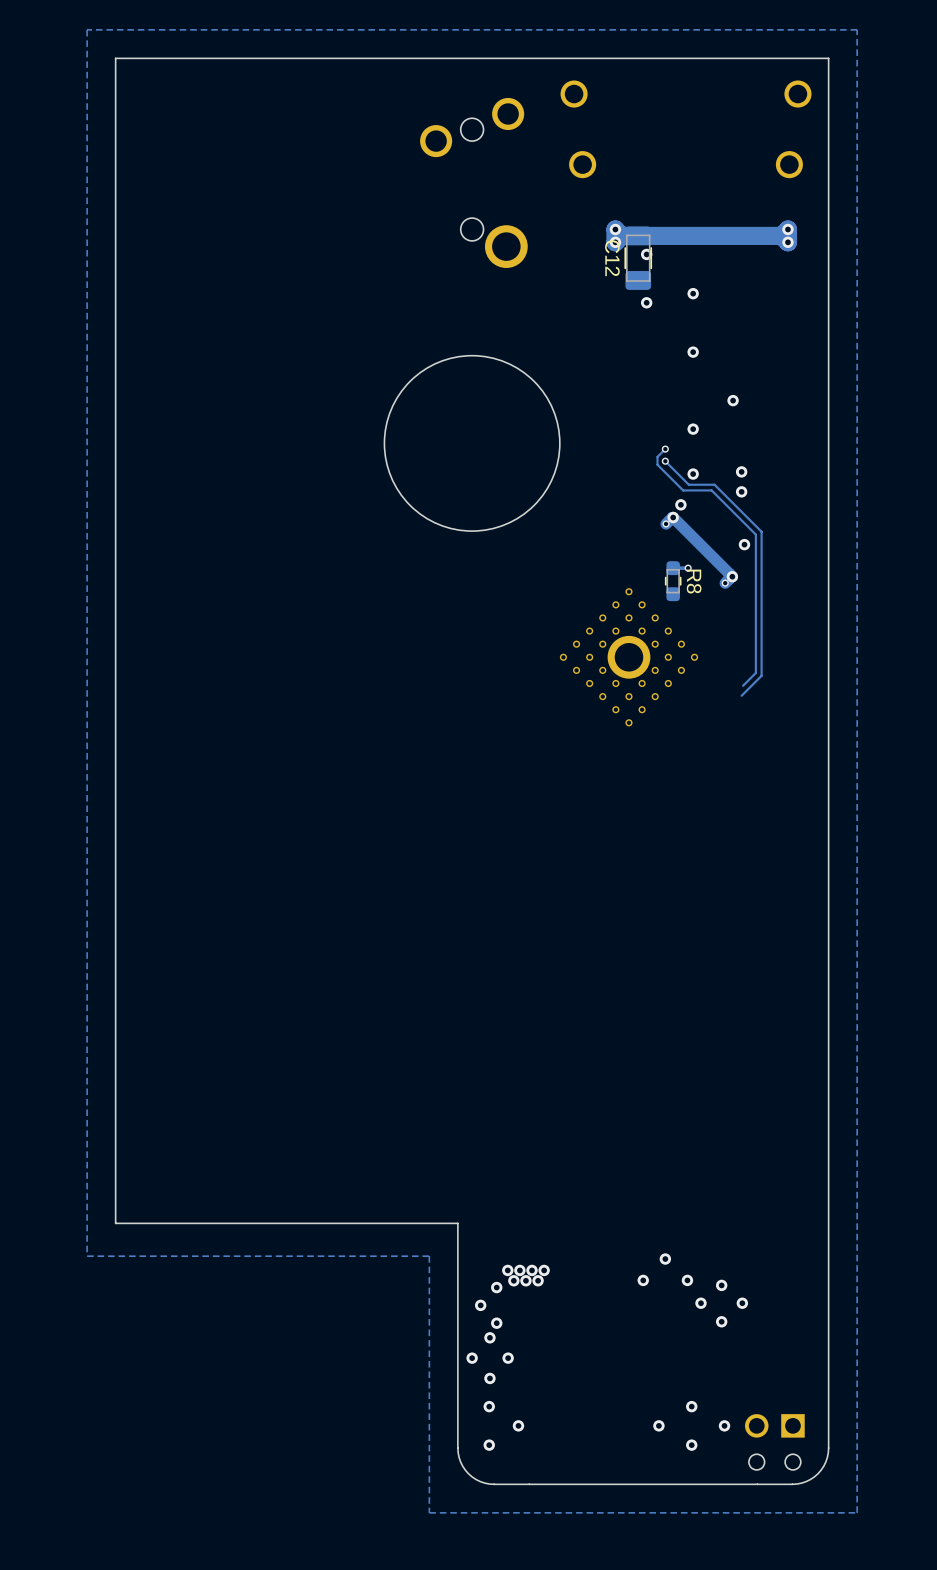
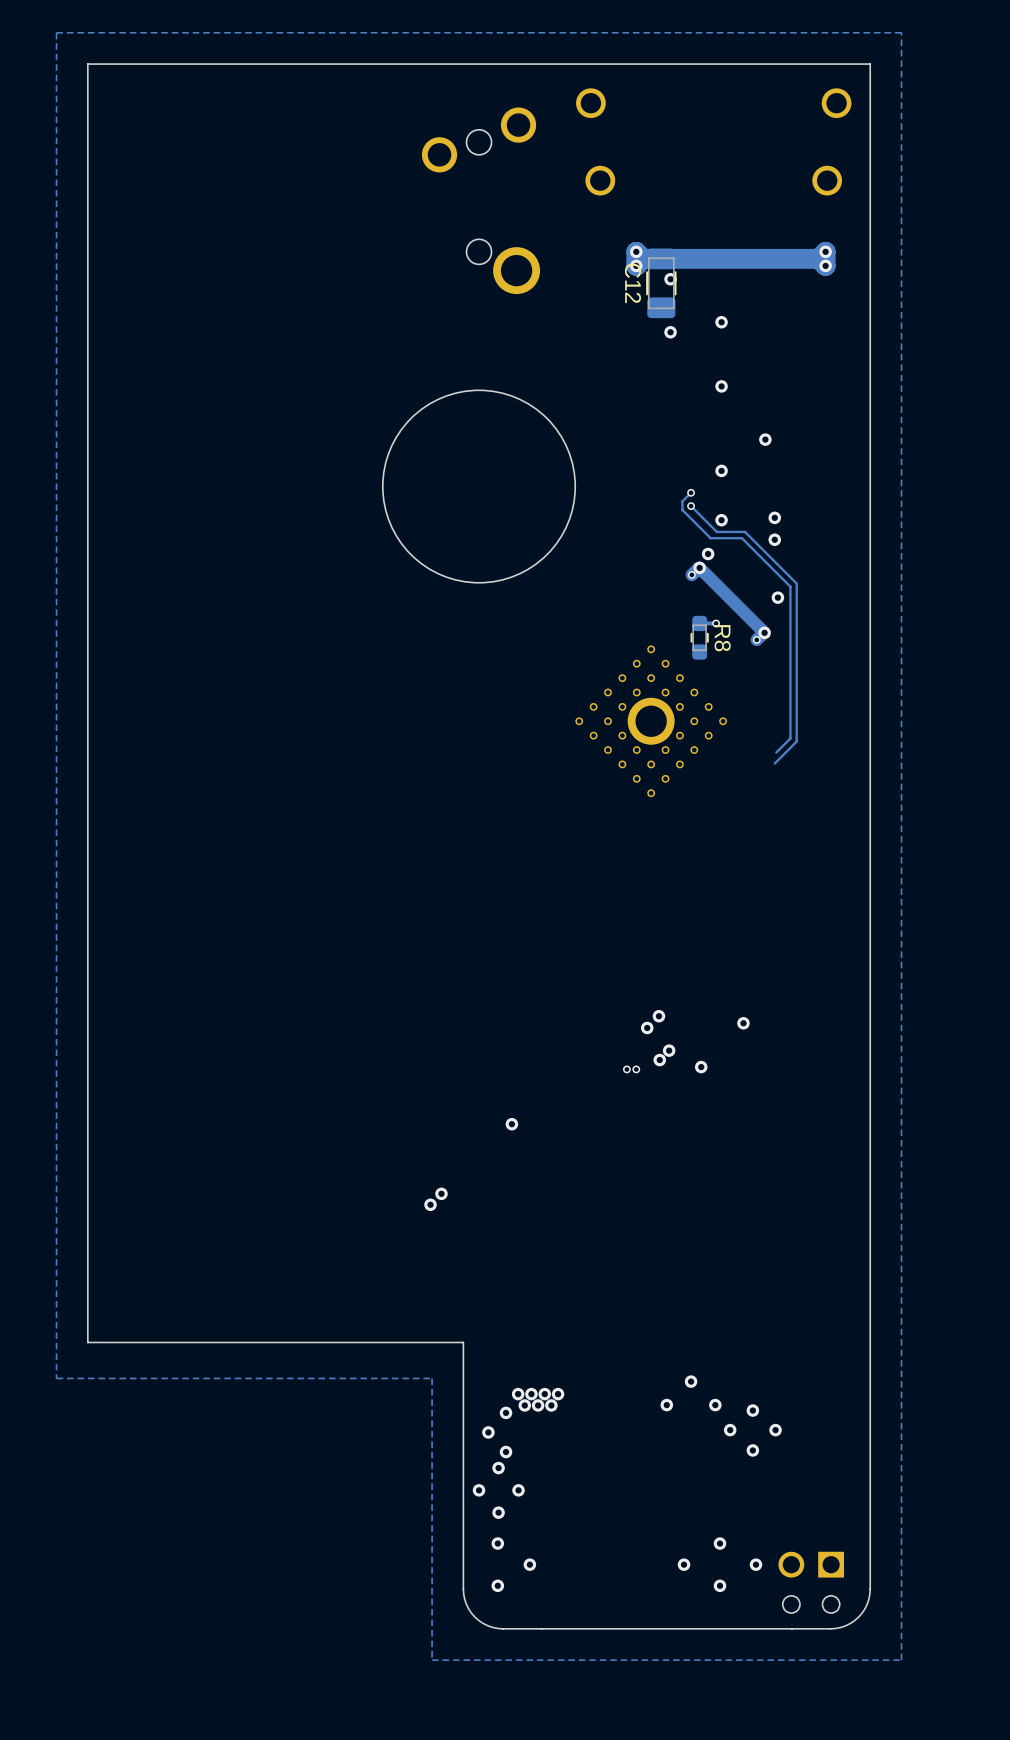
via: none -> (658, 1016)
via: none -> (743, 1023)
via: none -> (647, 1027)
via: none -> (669, 1050)
via: none -> (659, 1060)
via: none -> (701, 1067)
via: none -> (626, 1069)
via: none -> (636, 1069)
via: none -> (511, 1124)
via: none -> (441, 1193)
via: none -> (430, 1204)

